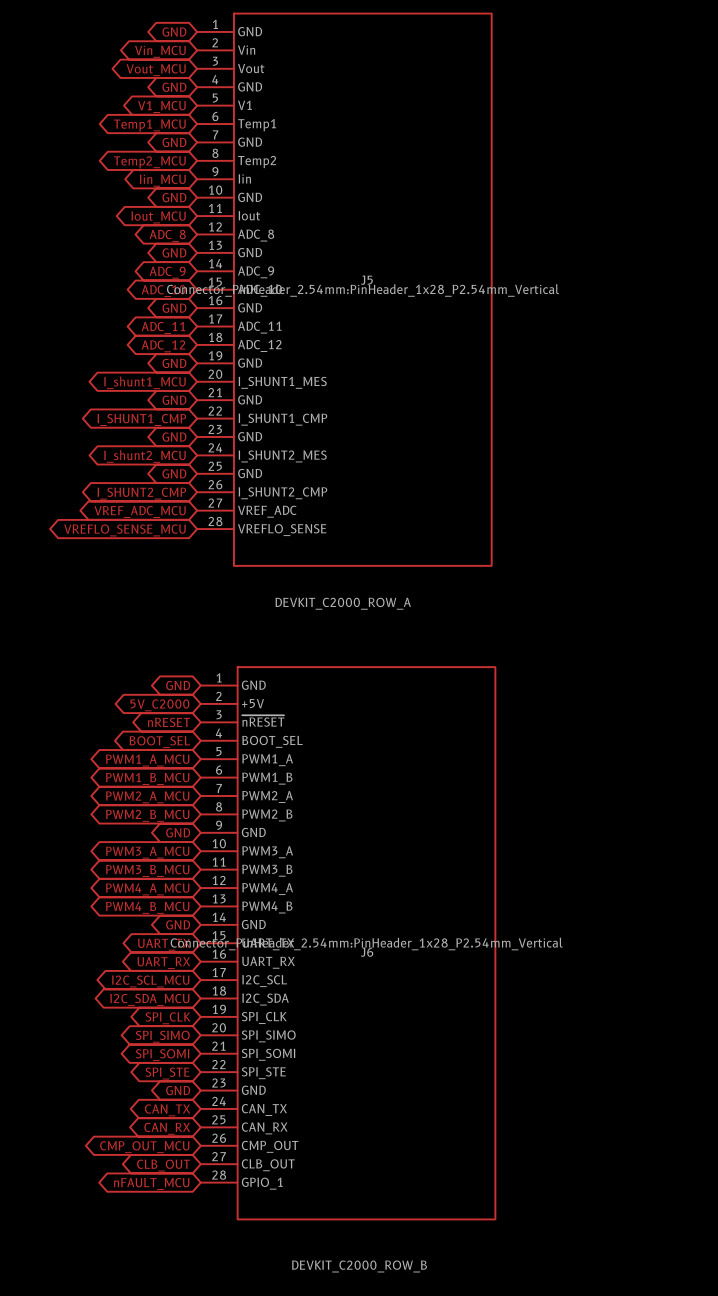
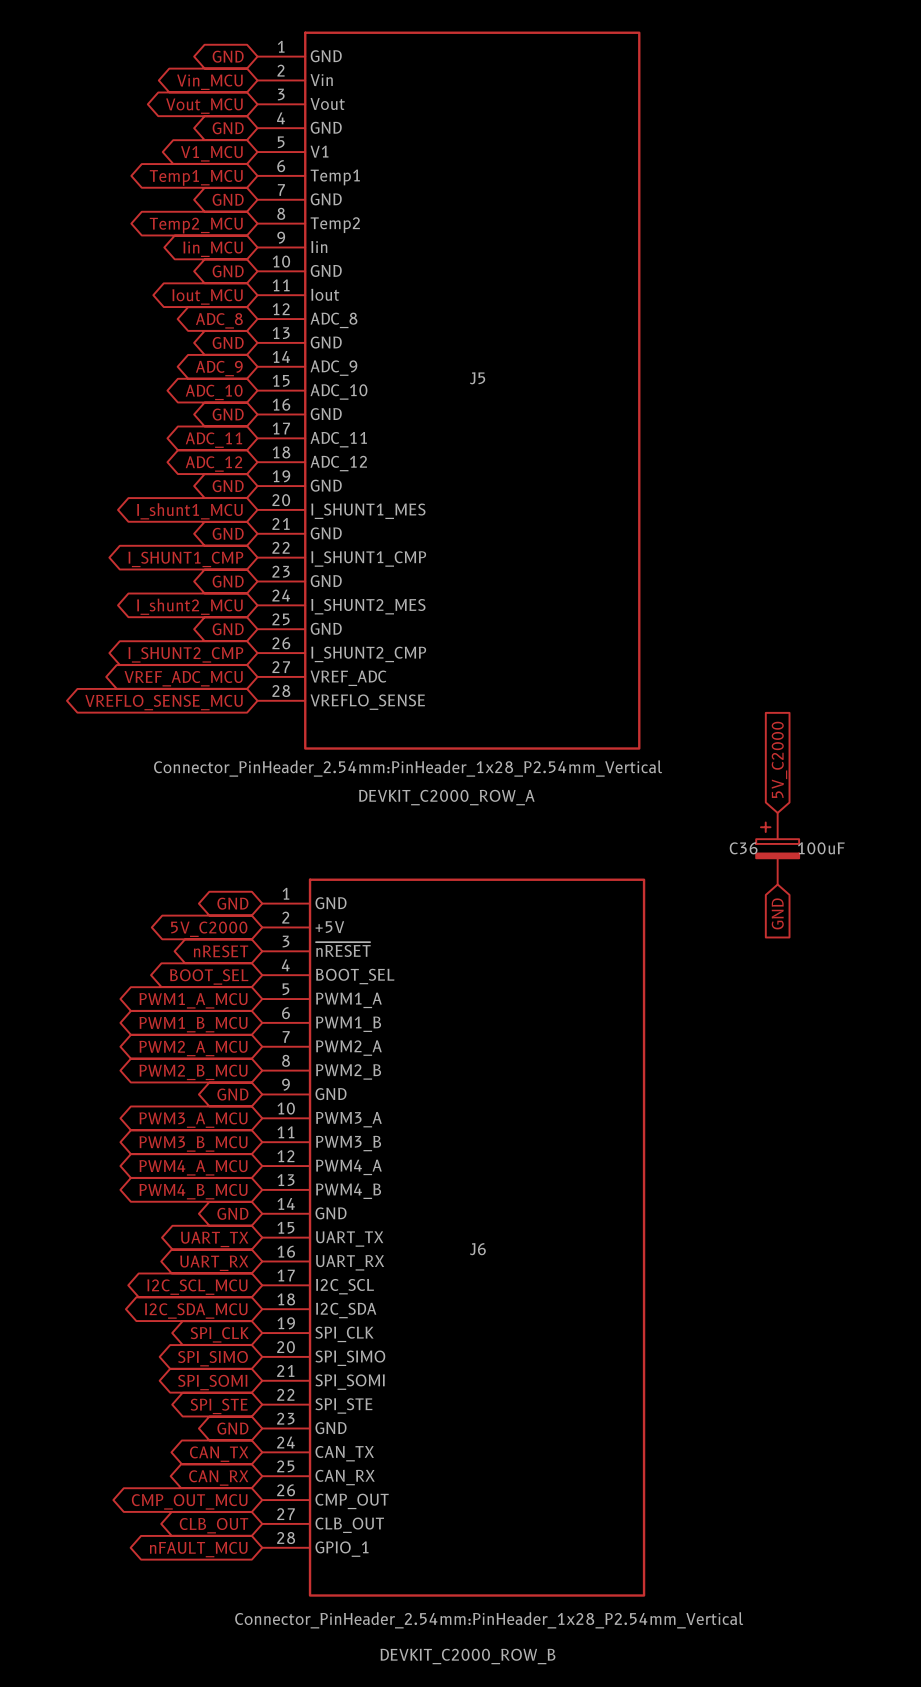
J5 text position: Connector_PinHeader_2.54mm:PinHeader_1x28_P2.54mm_Vertical (363, 290) -> Connector_PinHeader_2.54mm:PinHeader_1x28_P2.54mm_Vertical (408, 768)
global label: none -> 5V_C2000 (779, 759)
C36: none -> 100uF (777, 848)
global label: none -> GND (777, 913)
J6 text position: Connector_PinHeader_2.54mm:PinHeader_1x28_P2.54mm_Vertical (366, 944) -> Connector_PinHeader_2.54mm:PinHeader_1x28_P2.54mm_Vertical (489, 1620)

